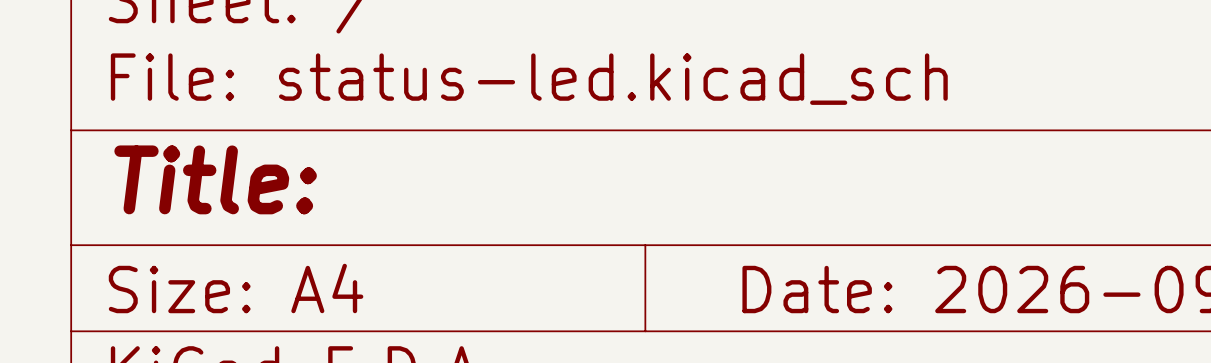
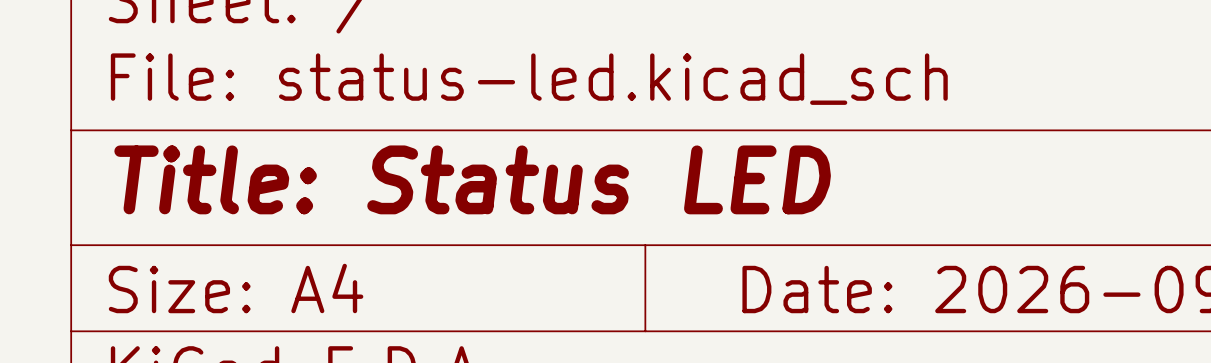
title block: Title: (215, 179) -> Title: Status LED (472, 179)

